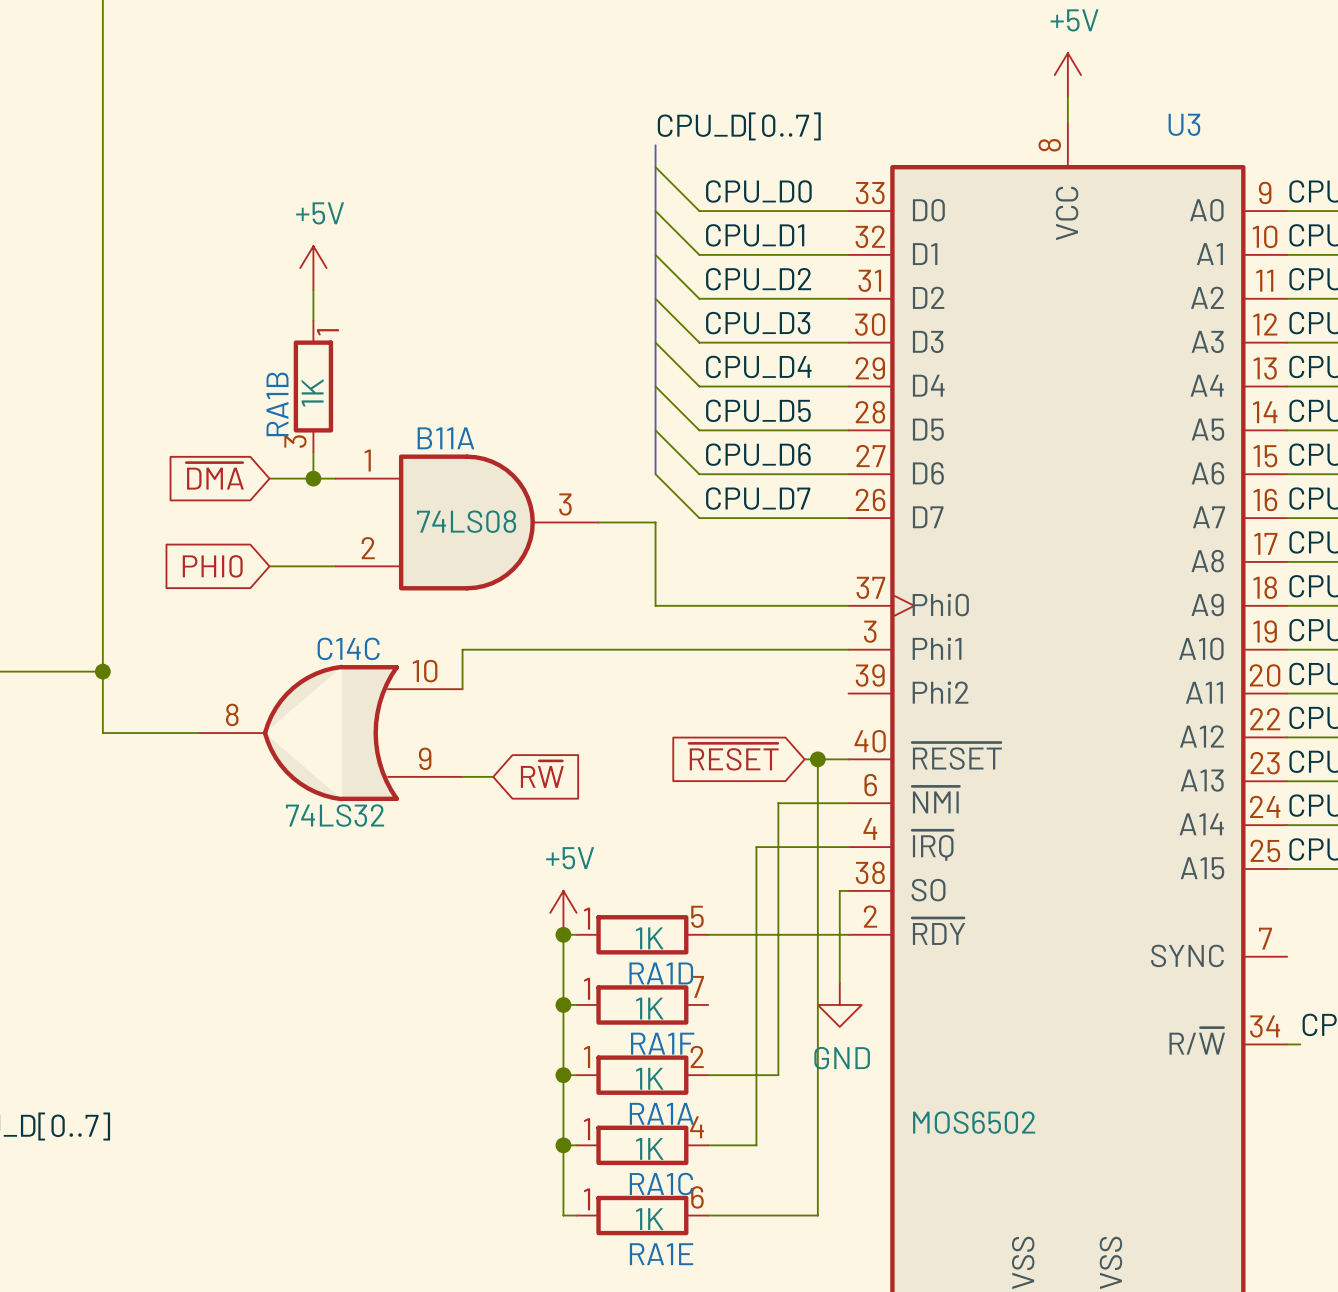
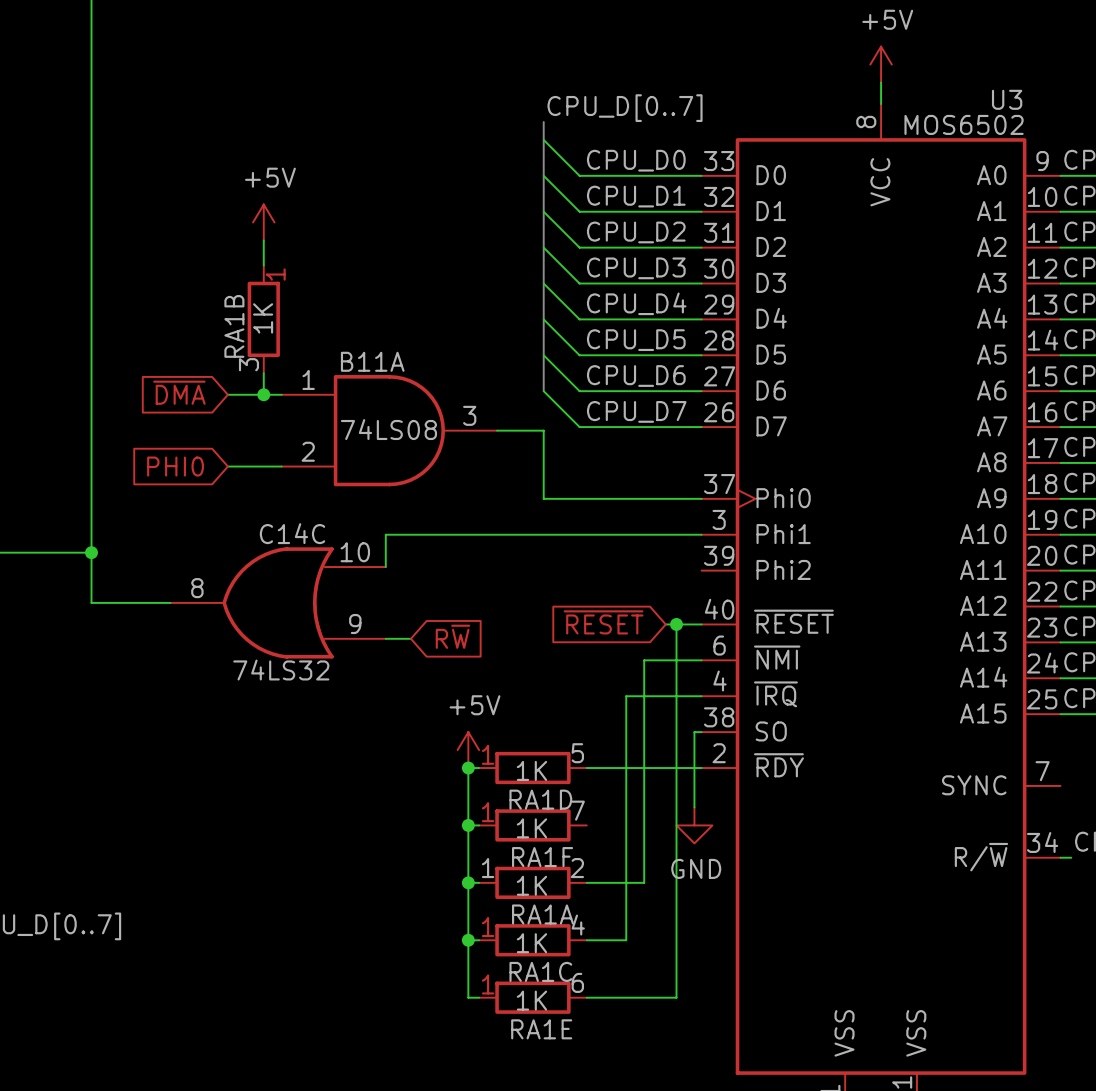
U3 name position: U3 (1184, 124) -> U3 (1007, 99)
U3 value position: MOS6502 (974, 1122) -> MOS6502 (964, 124)

